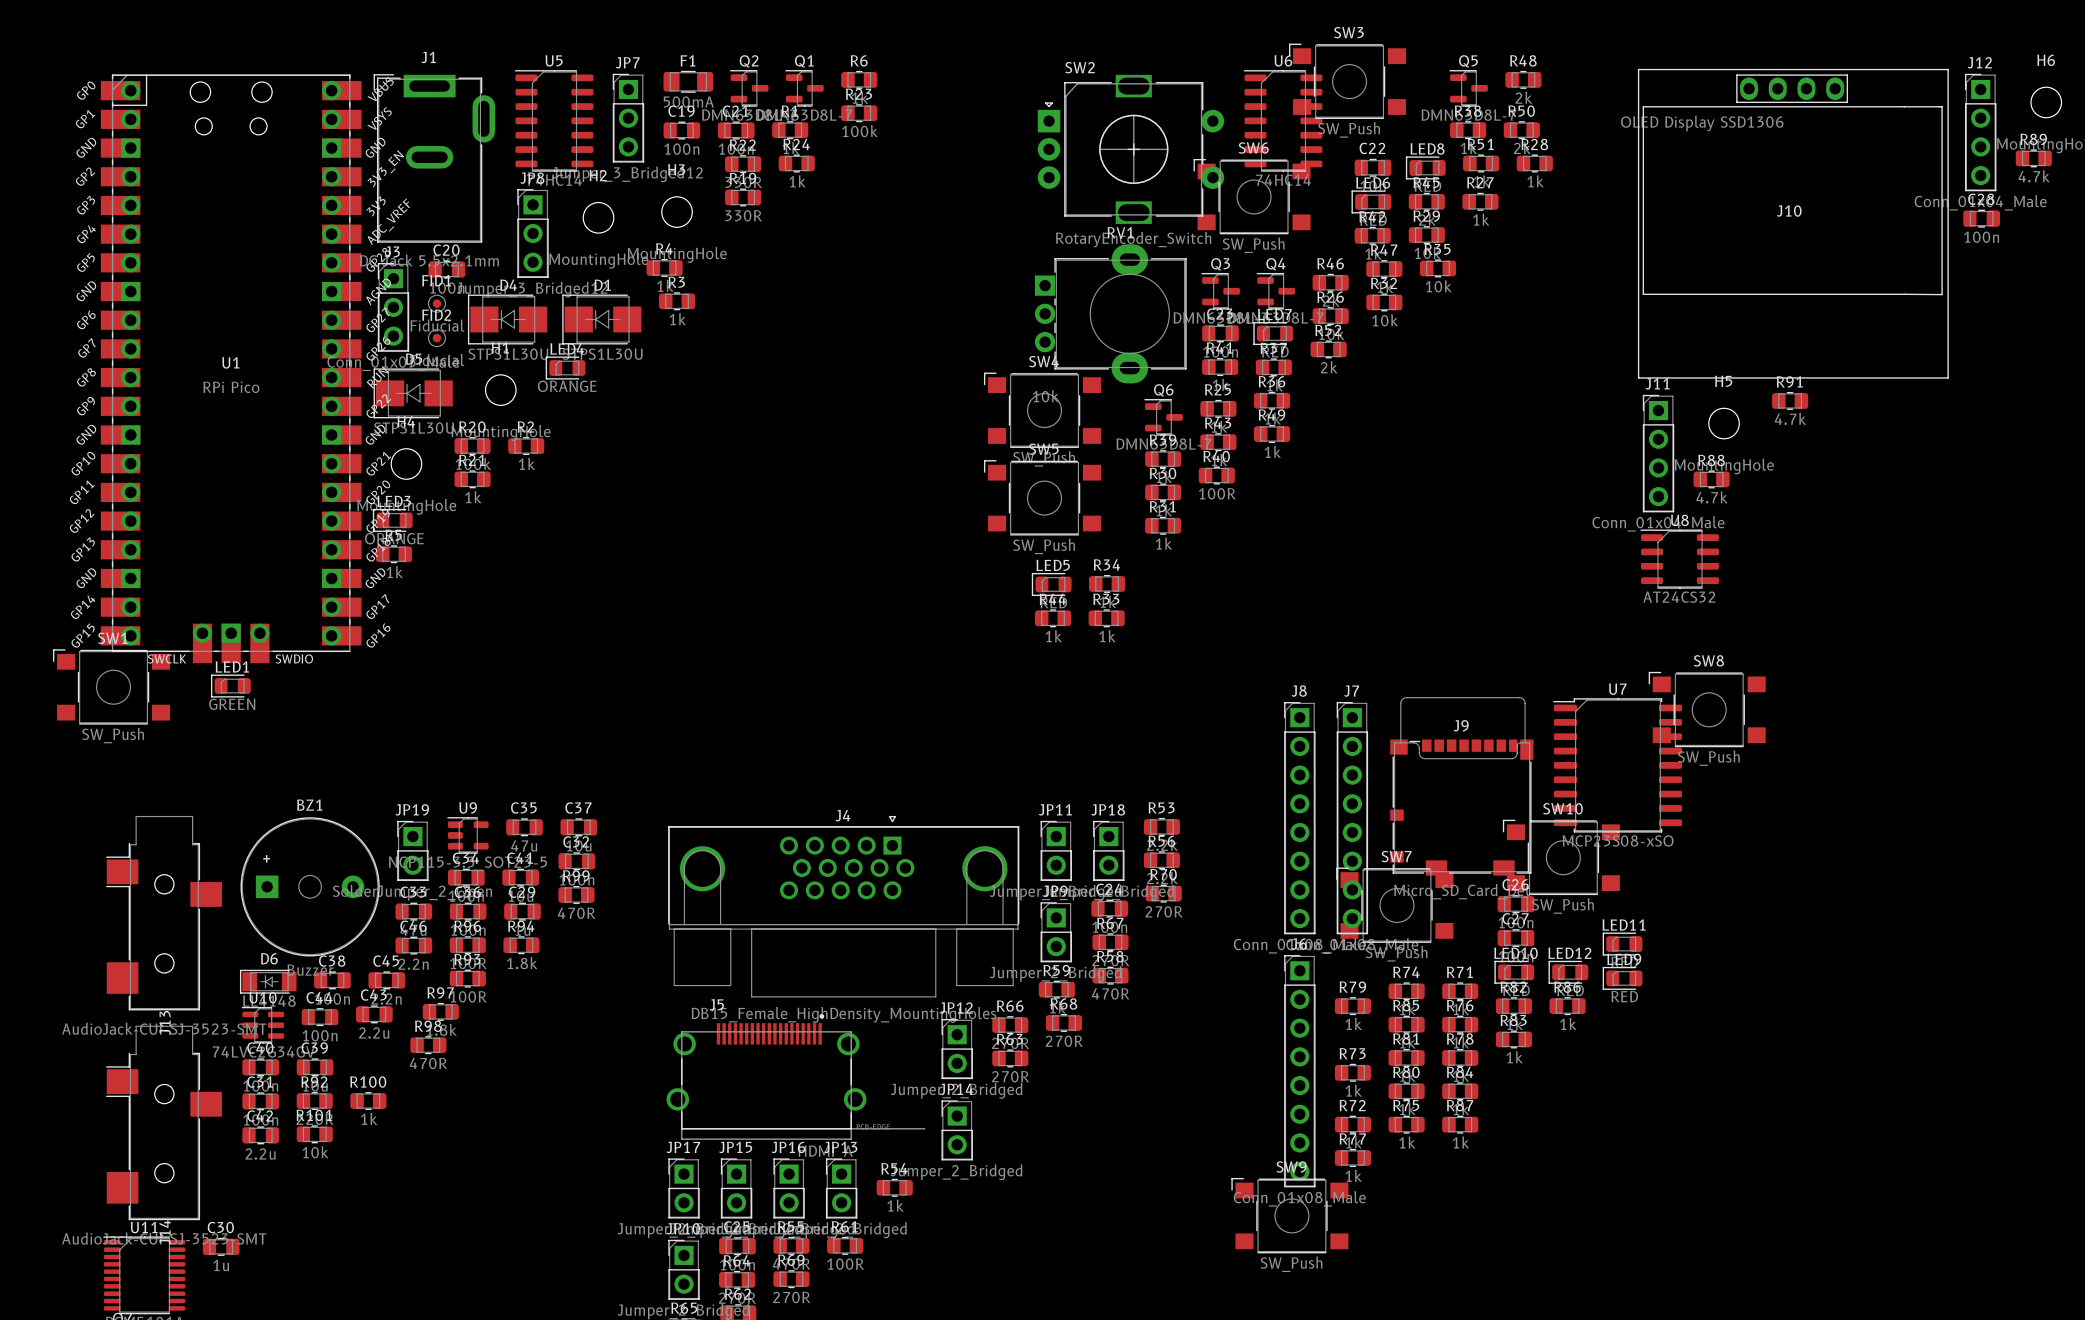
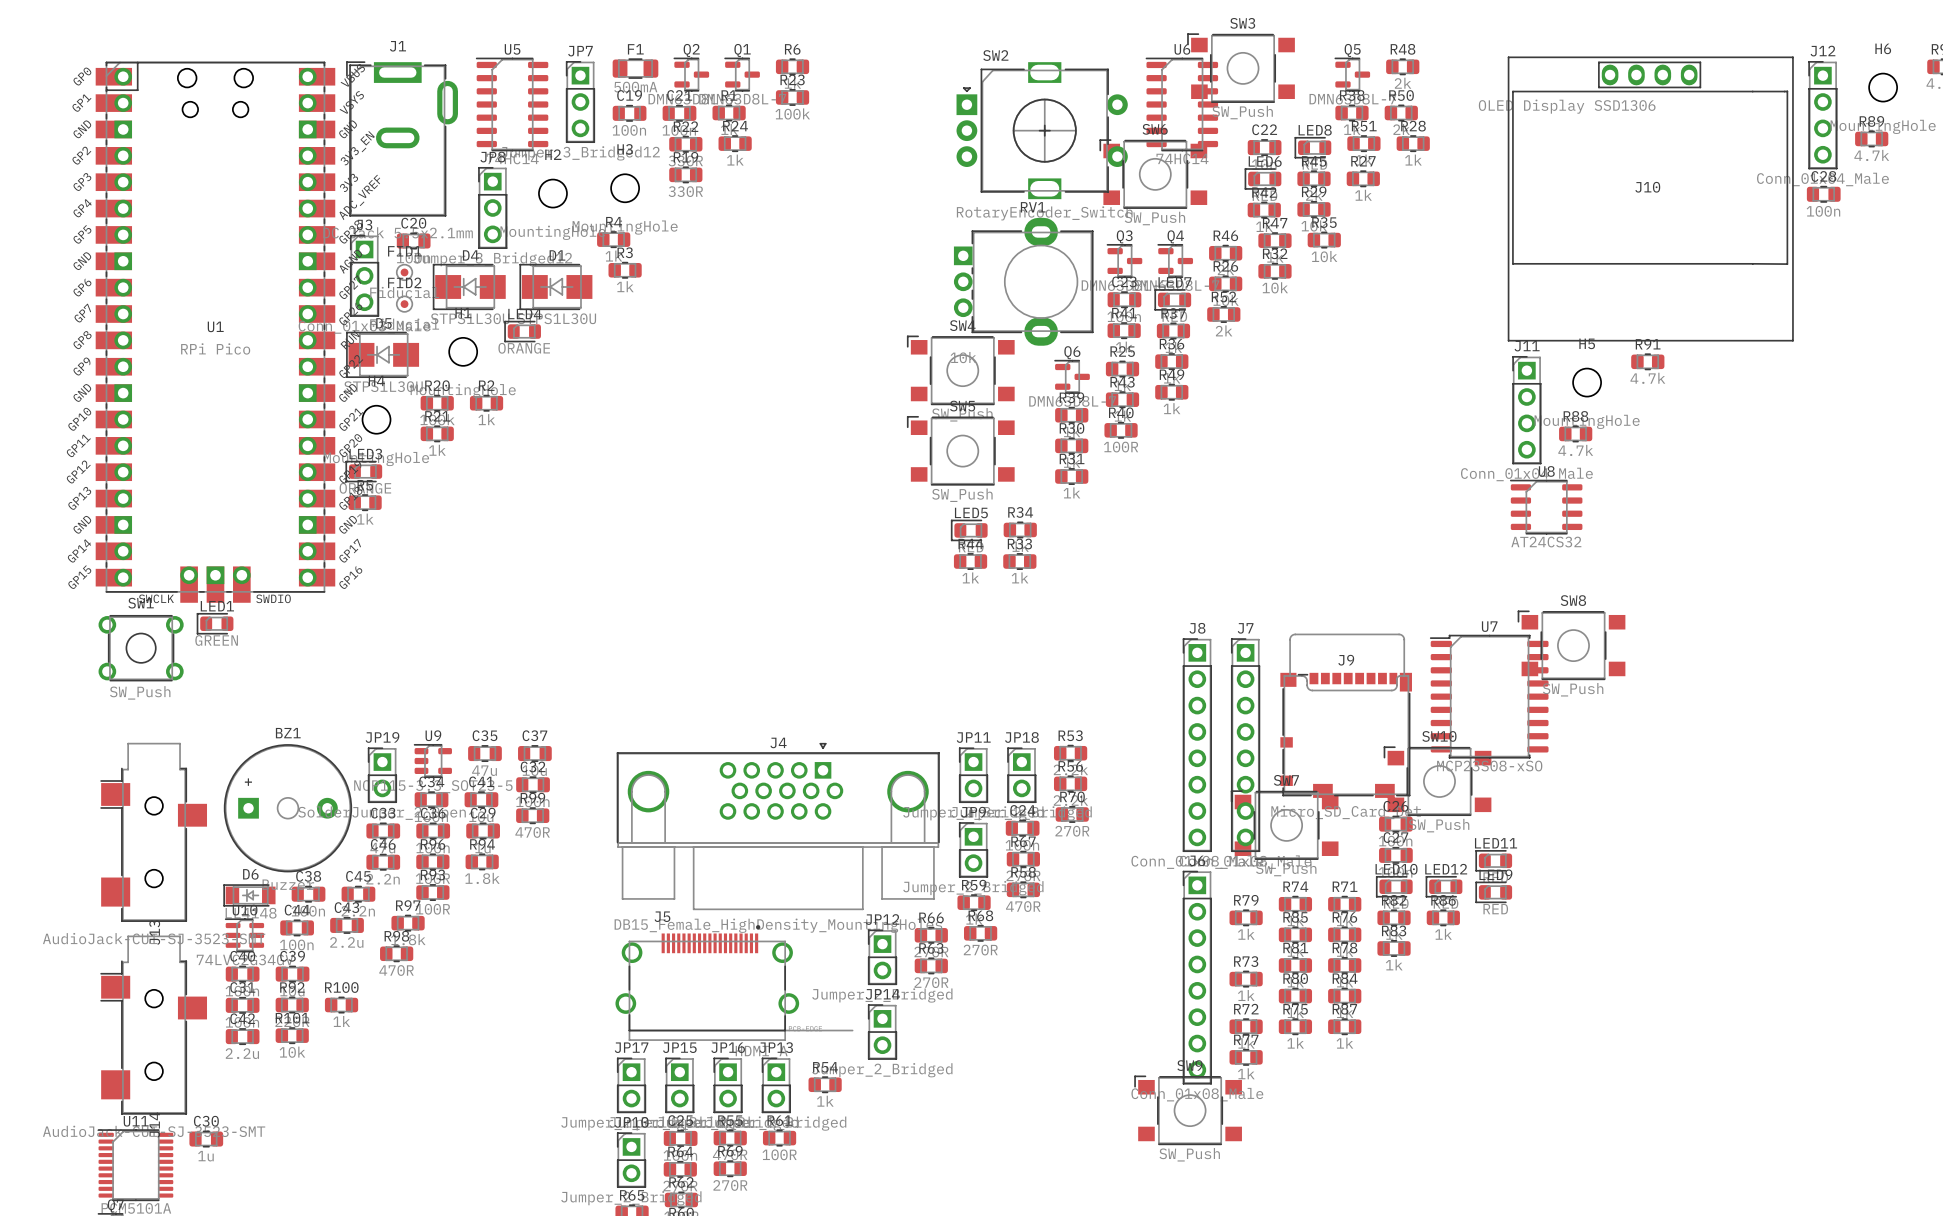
SW1 footprint: [52, 649, 171, 725] -> [98, 615, 184, 682]

